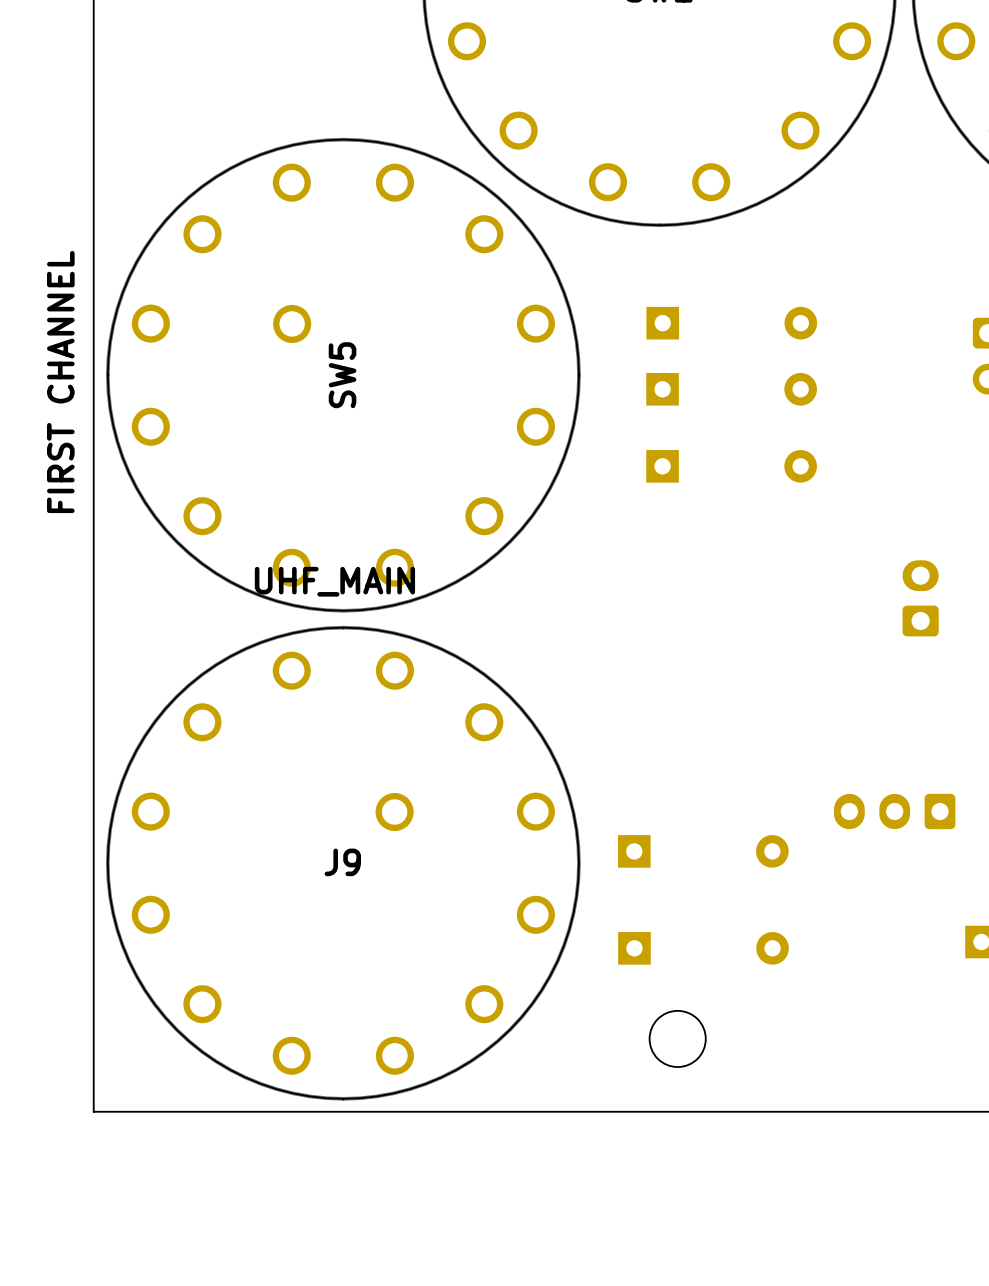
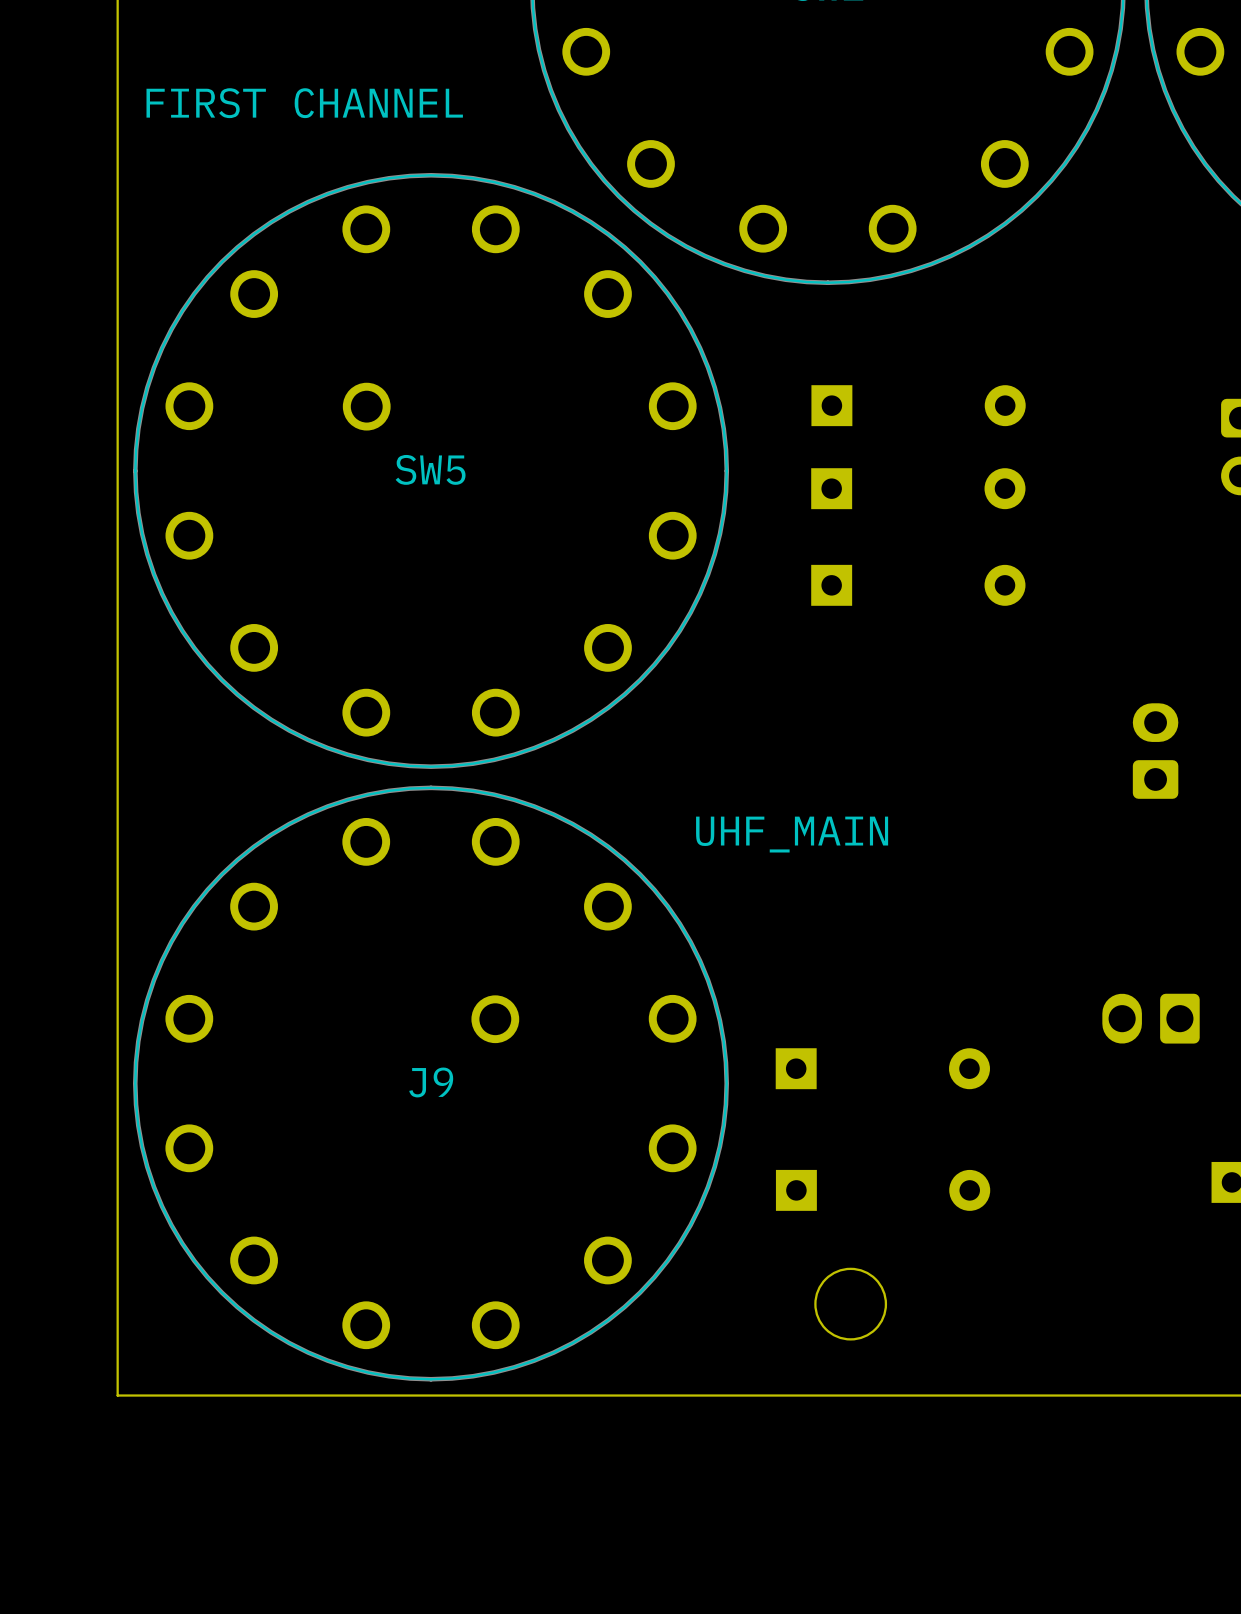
SW5 name rotation: 0° (342, 375) -> 90° clockwise (430, 469)
SW5 value rotation: 0° (60, 381) -> 90° clockwise (304, 103)
SW5 value position: FIRST CHANNEL (60, 381) -> FIRST CHANNEL (304, 103)
J9 value position: UHF_MAIN (334, 581) -> UHF_MAIN (792, 834)
part: (894, 811) -> none
part: none -> (1151, 1018)

